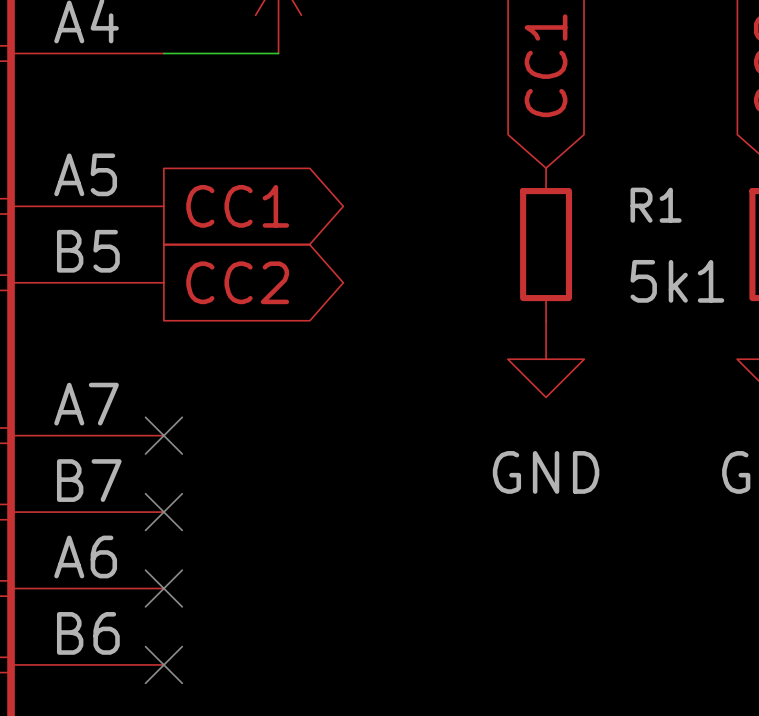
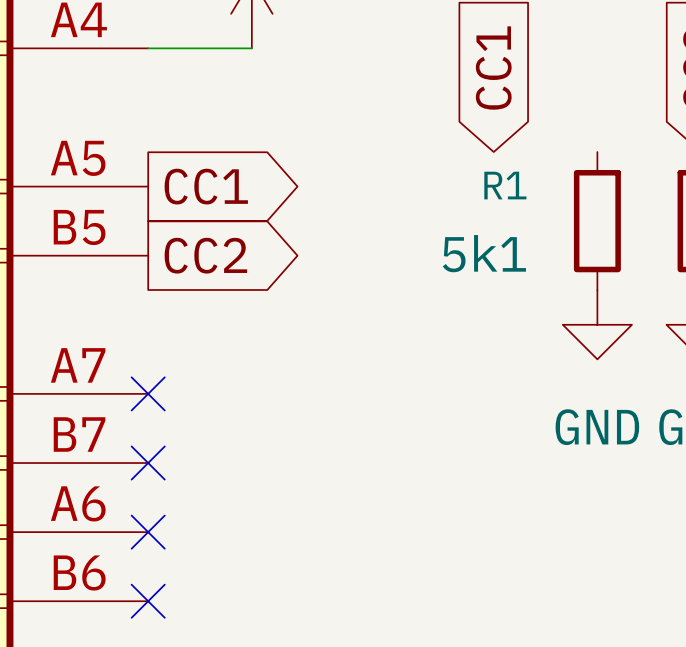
R1 name position: R1 (656, 205) -> R1 (505, 185)
R1 position: (546, 244) -> (597, 221)
R1 value position: 5k1 (677, 281) -> 5k1 (484, 253)
power symbol position: GND (546, 359) -> GND (597, 324)

